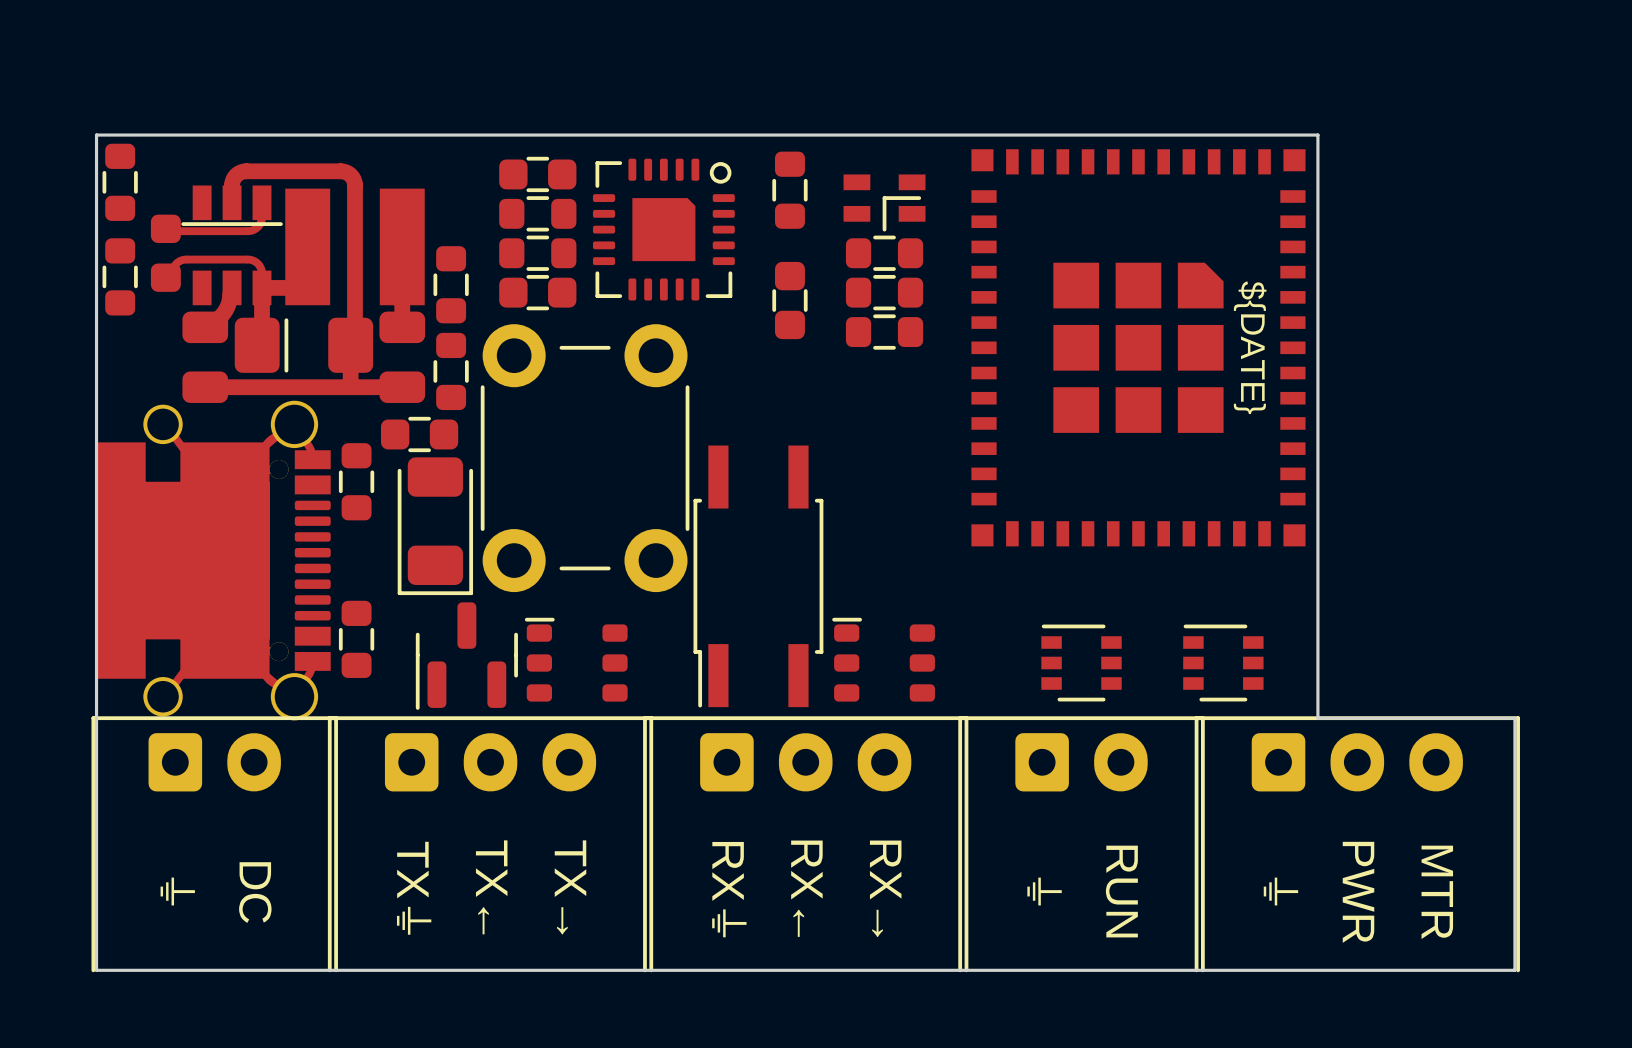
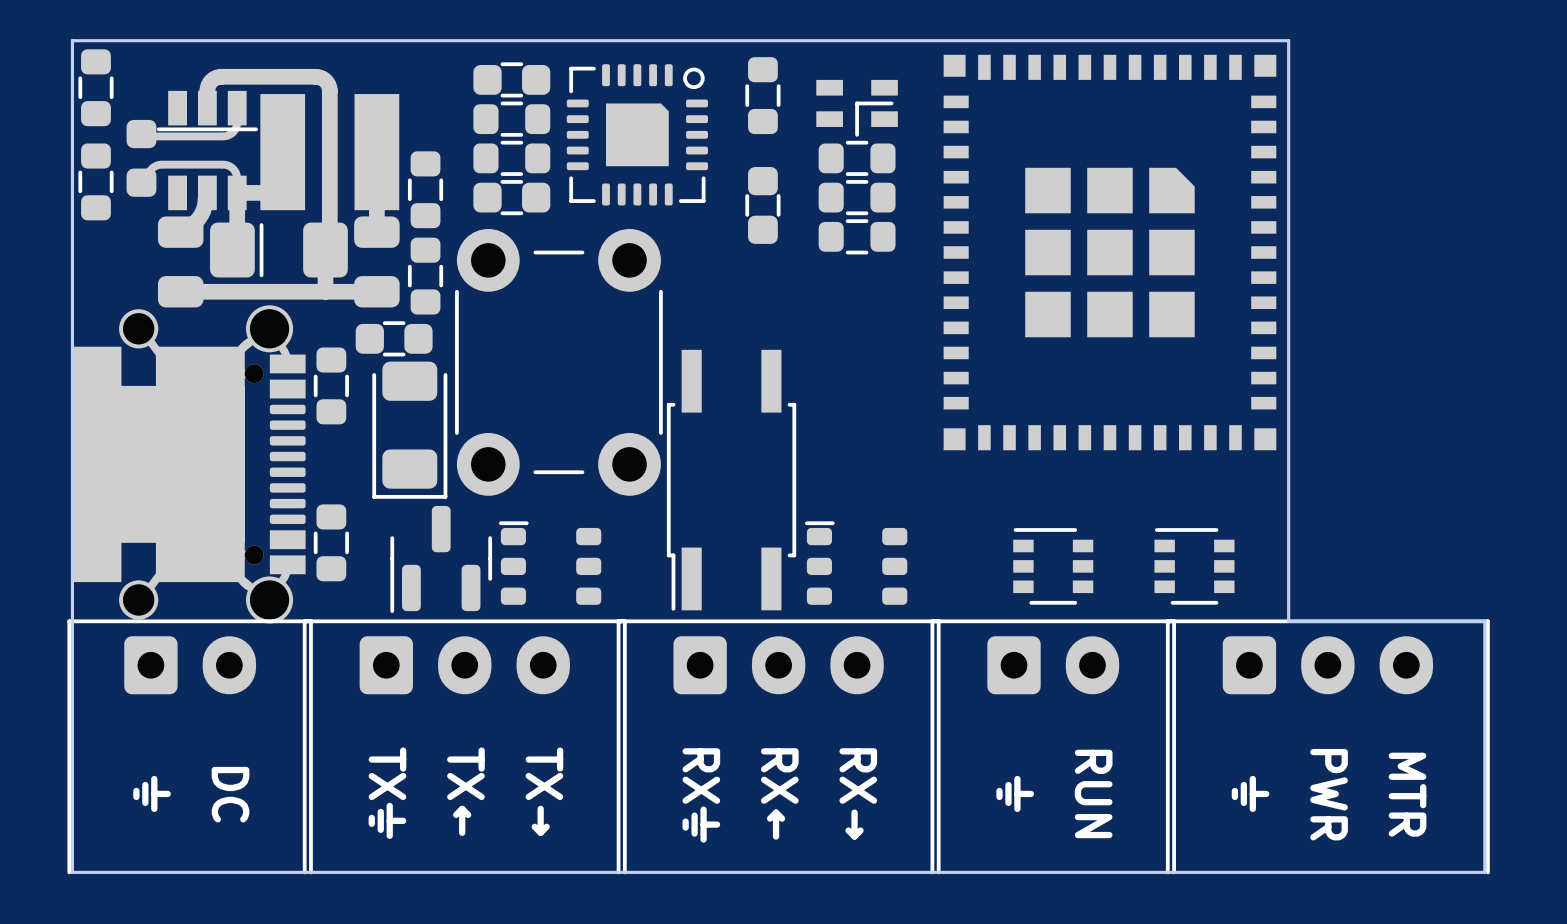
part text: ${DATE} (1250, 347) -> none

